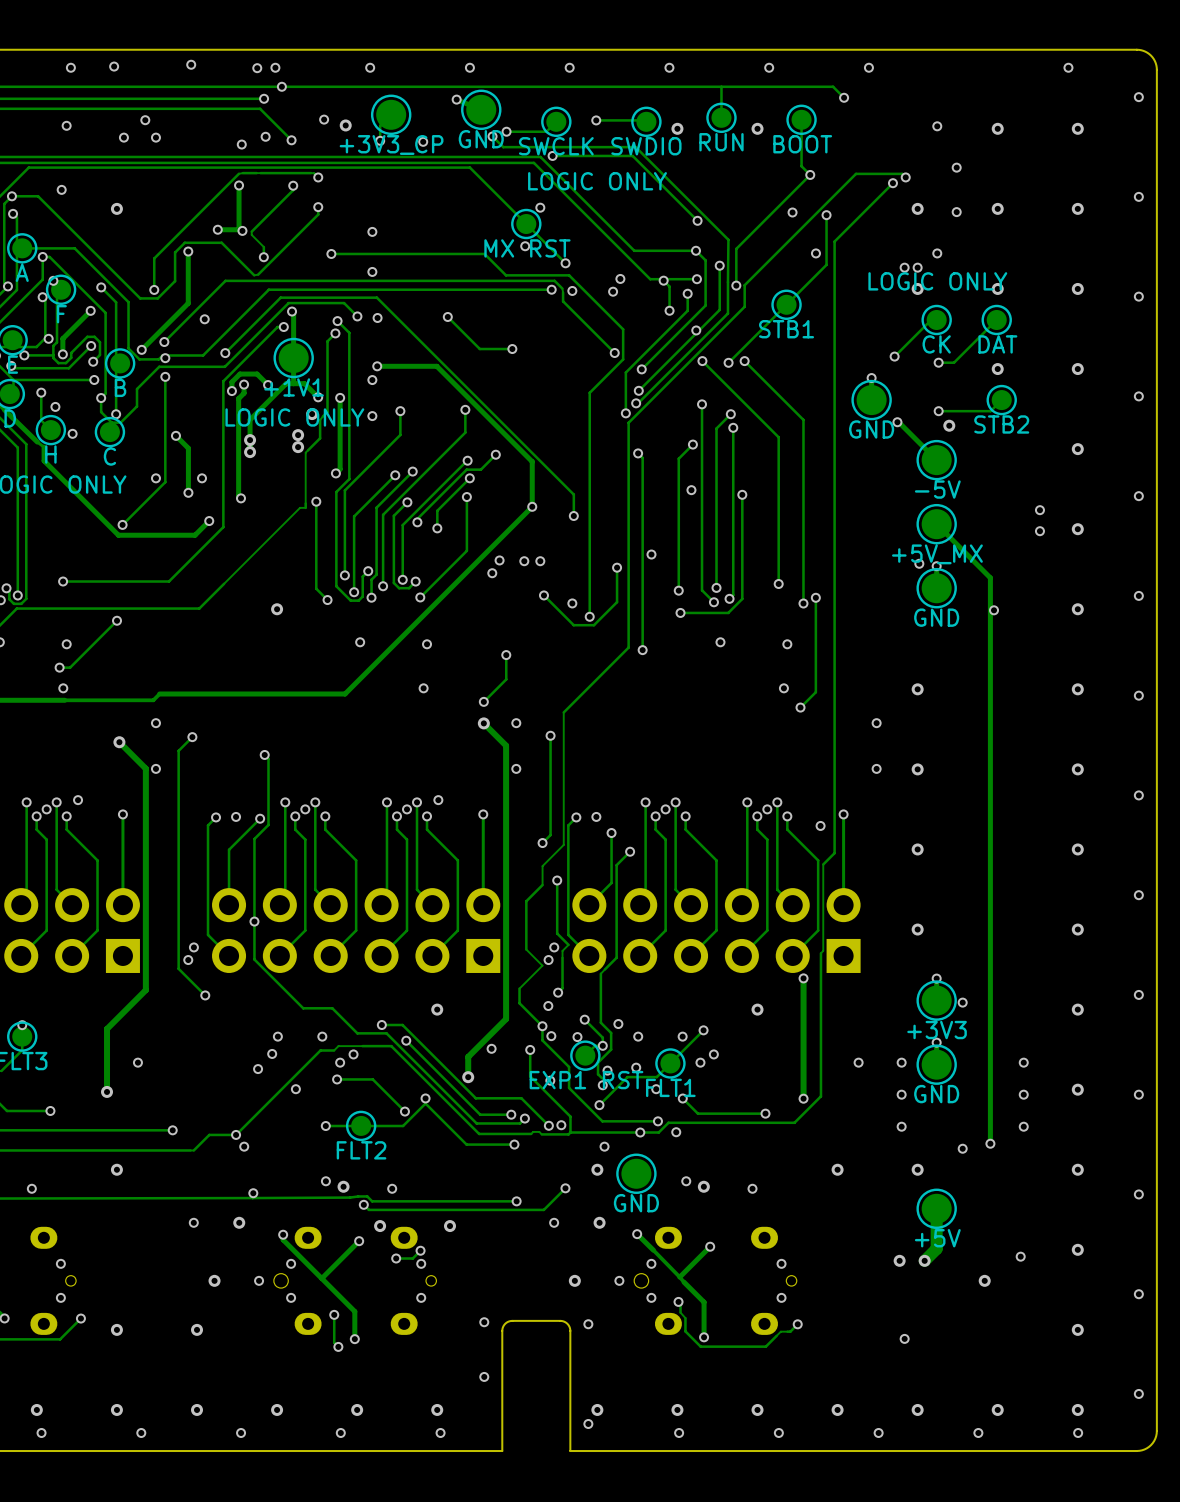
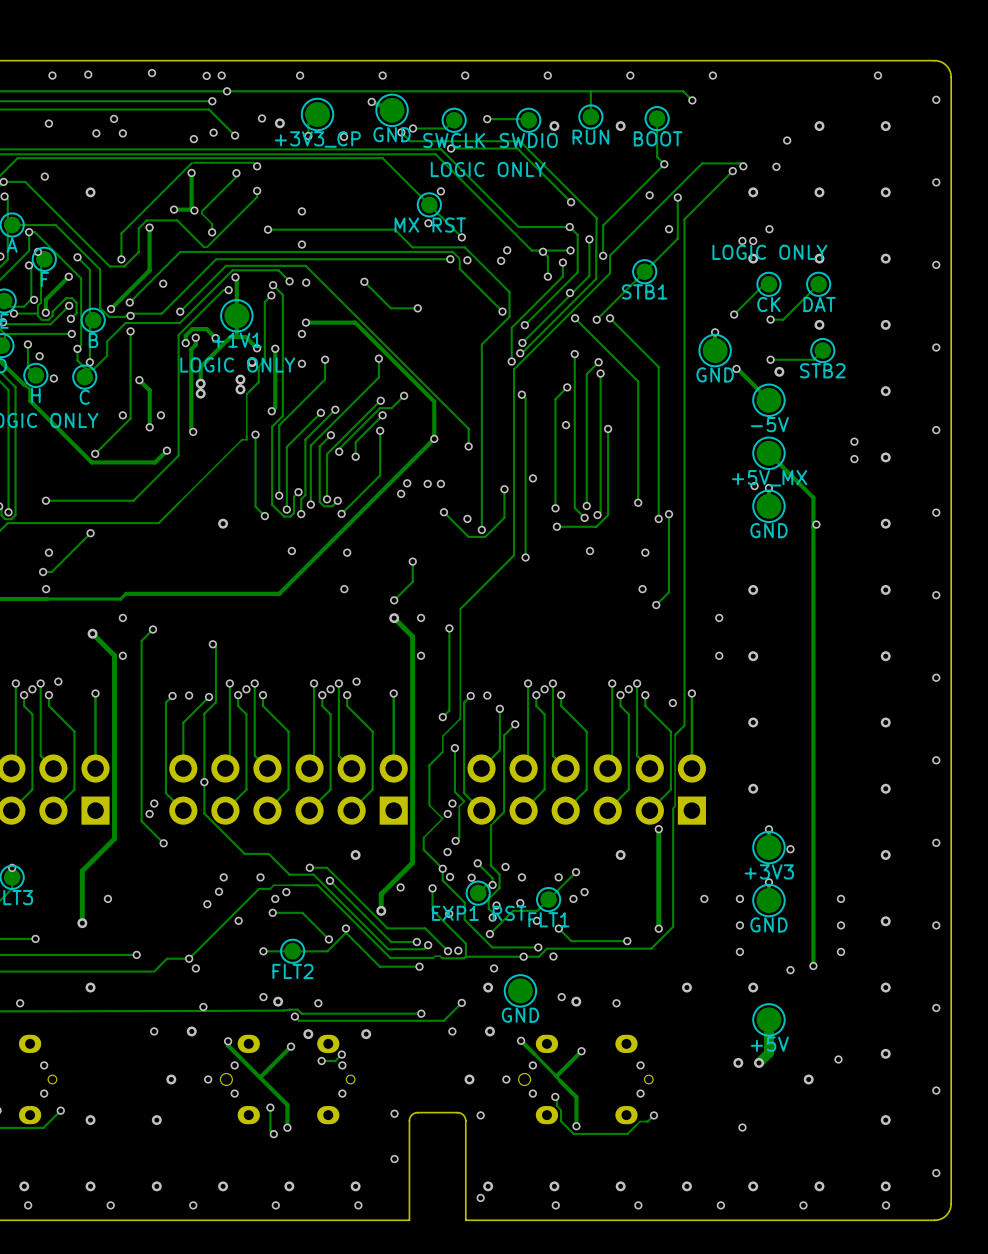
via: (937, 126) -> none
via: none -> (787, 140)
via: (956, 167) -> none
via: none -> (776, 166)
via: (956, 212) -> none

